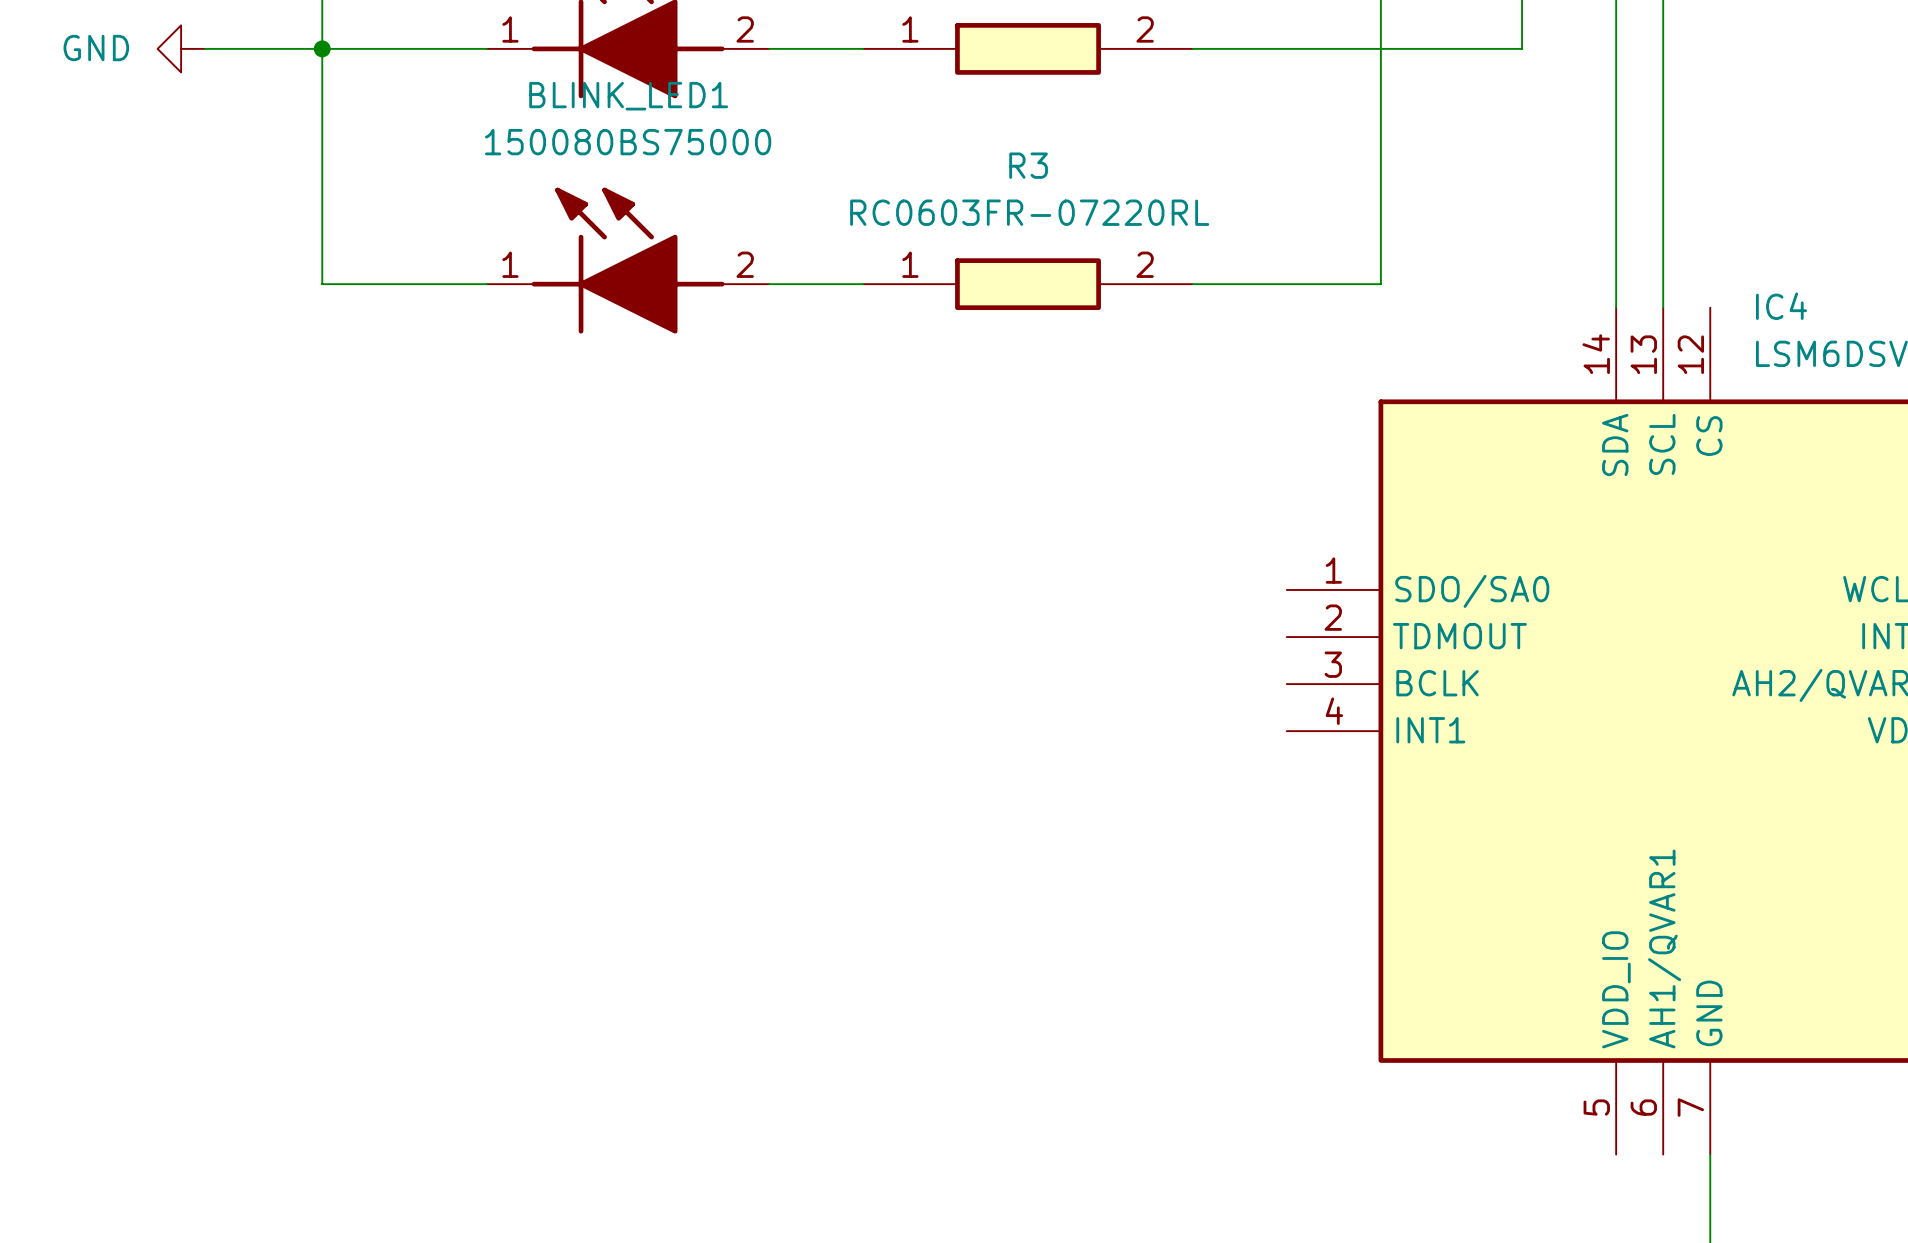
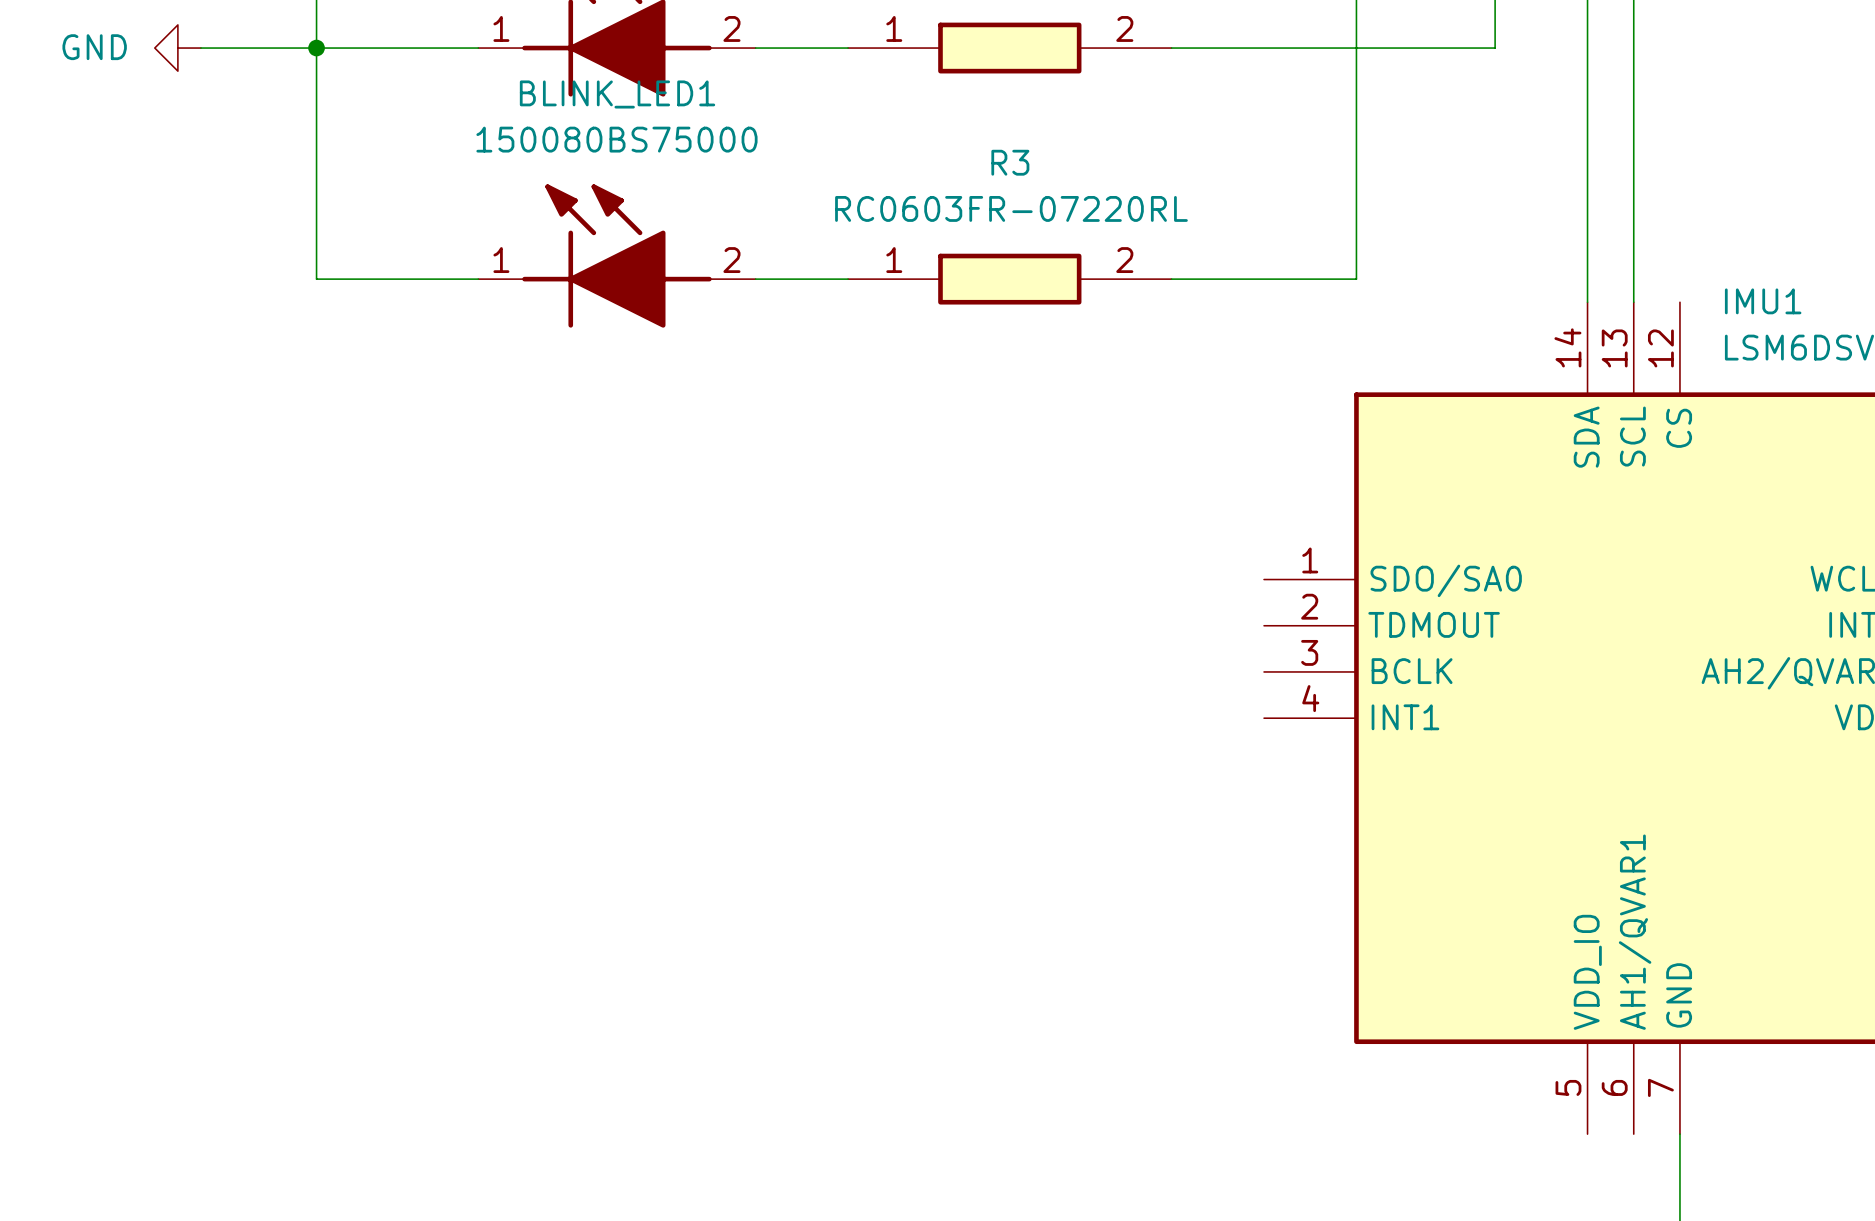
IC4 name: IC4 (1781, 306) -> IMU1 (1763, 301)

